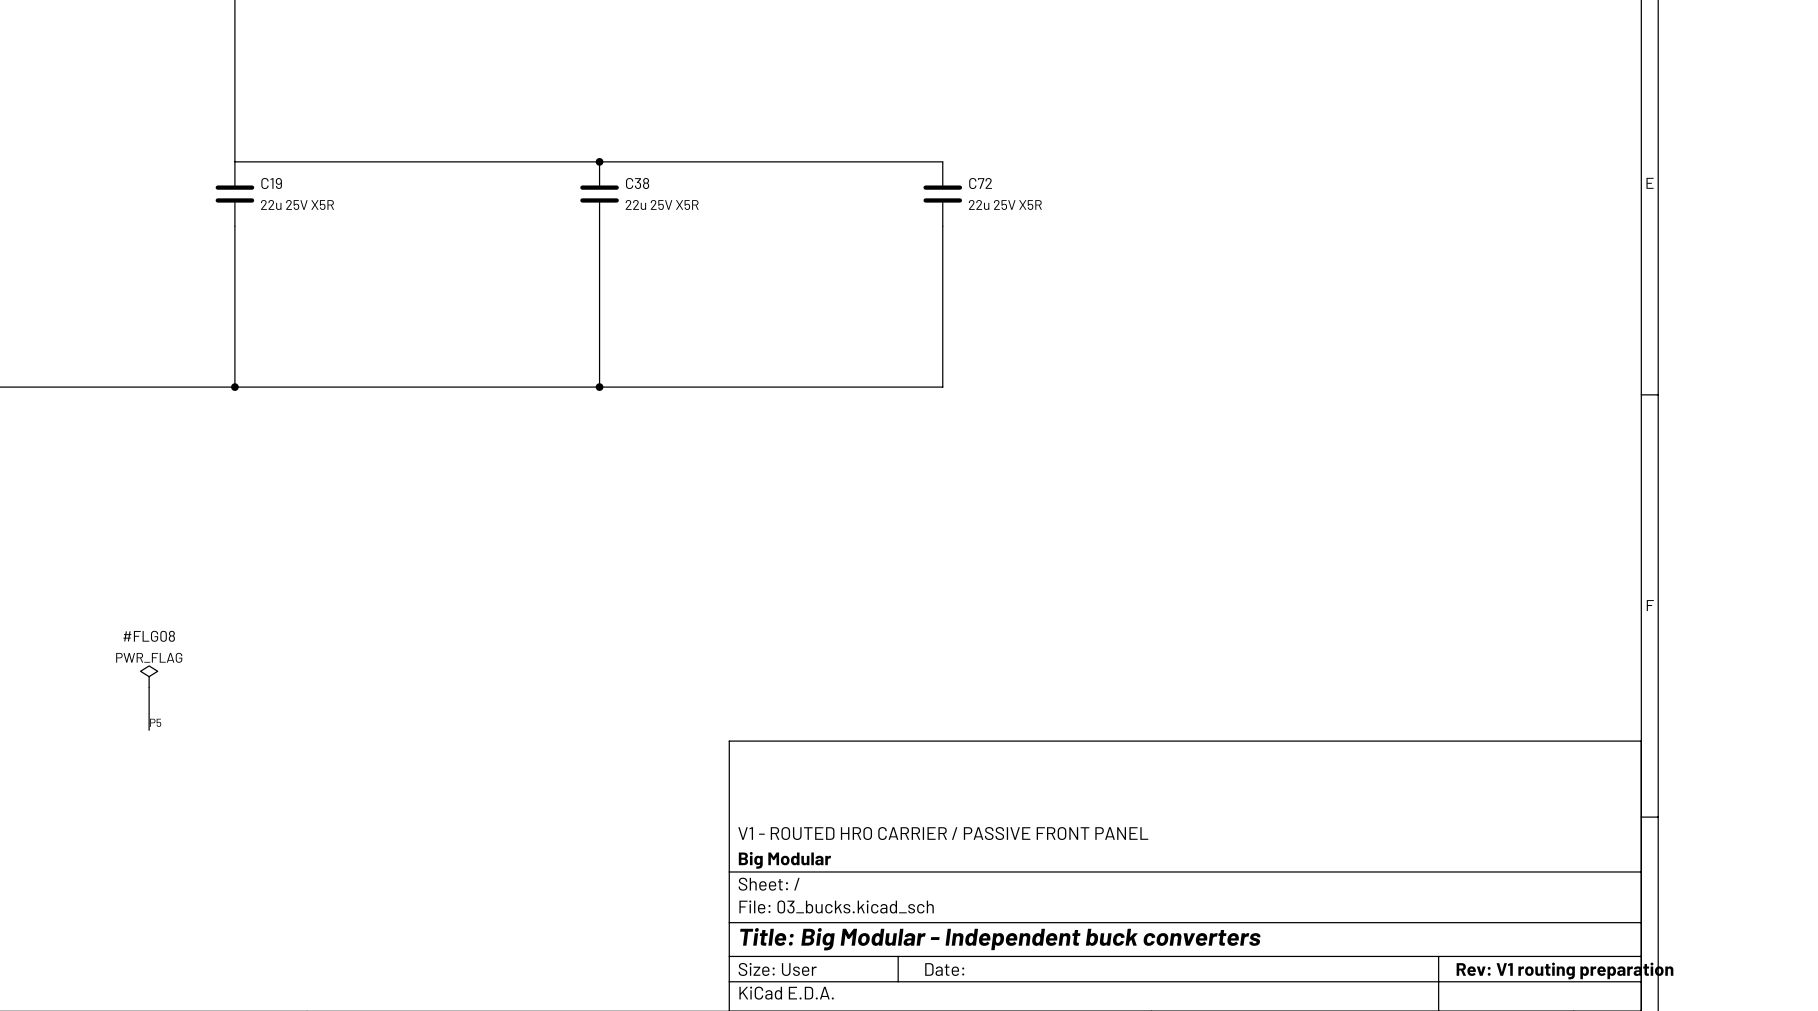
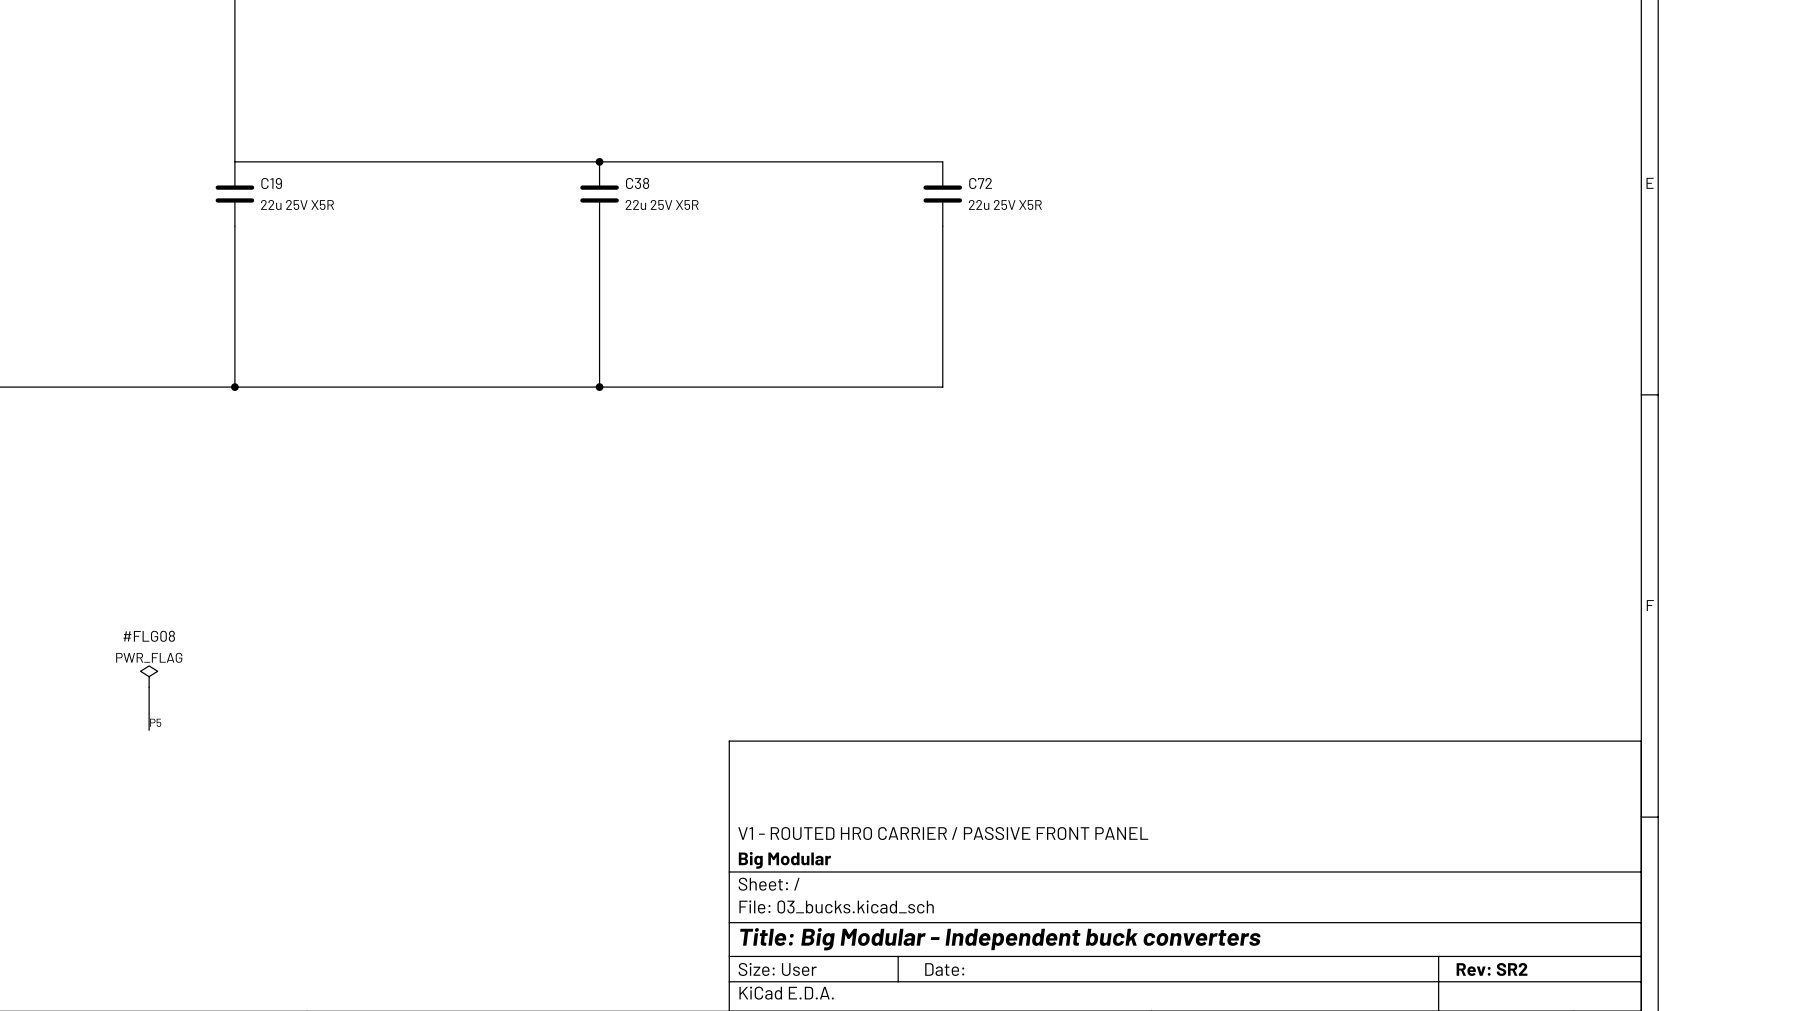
title block: Rev: V1 routing preparation (1564, 970) -> Rev: SR2 (1492, 969)

